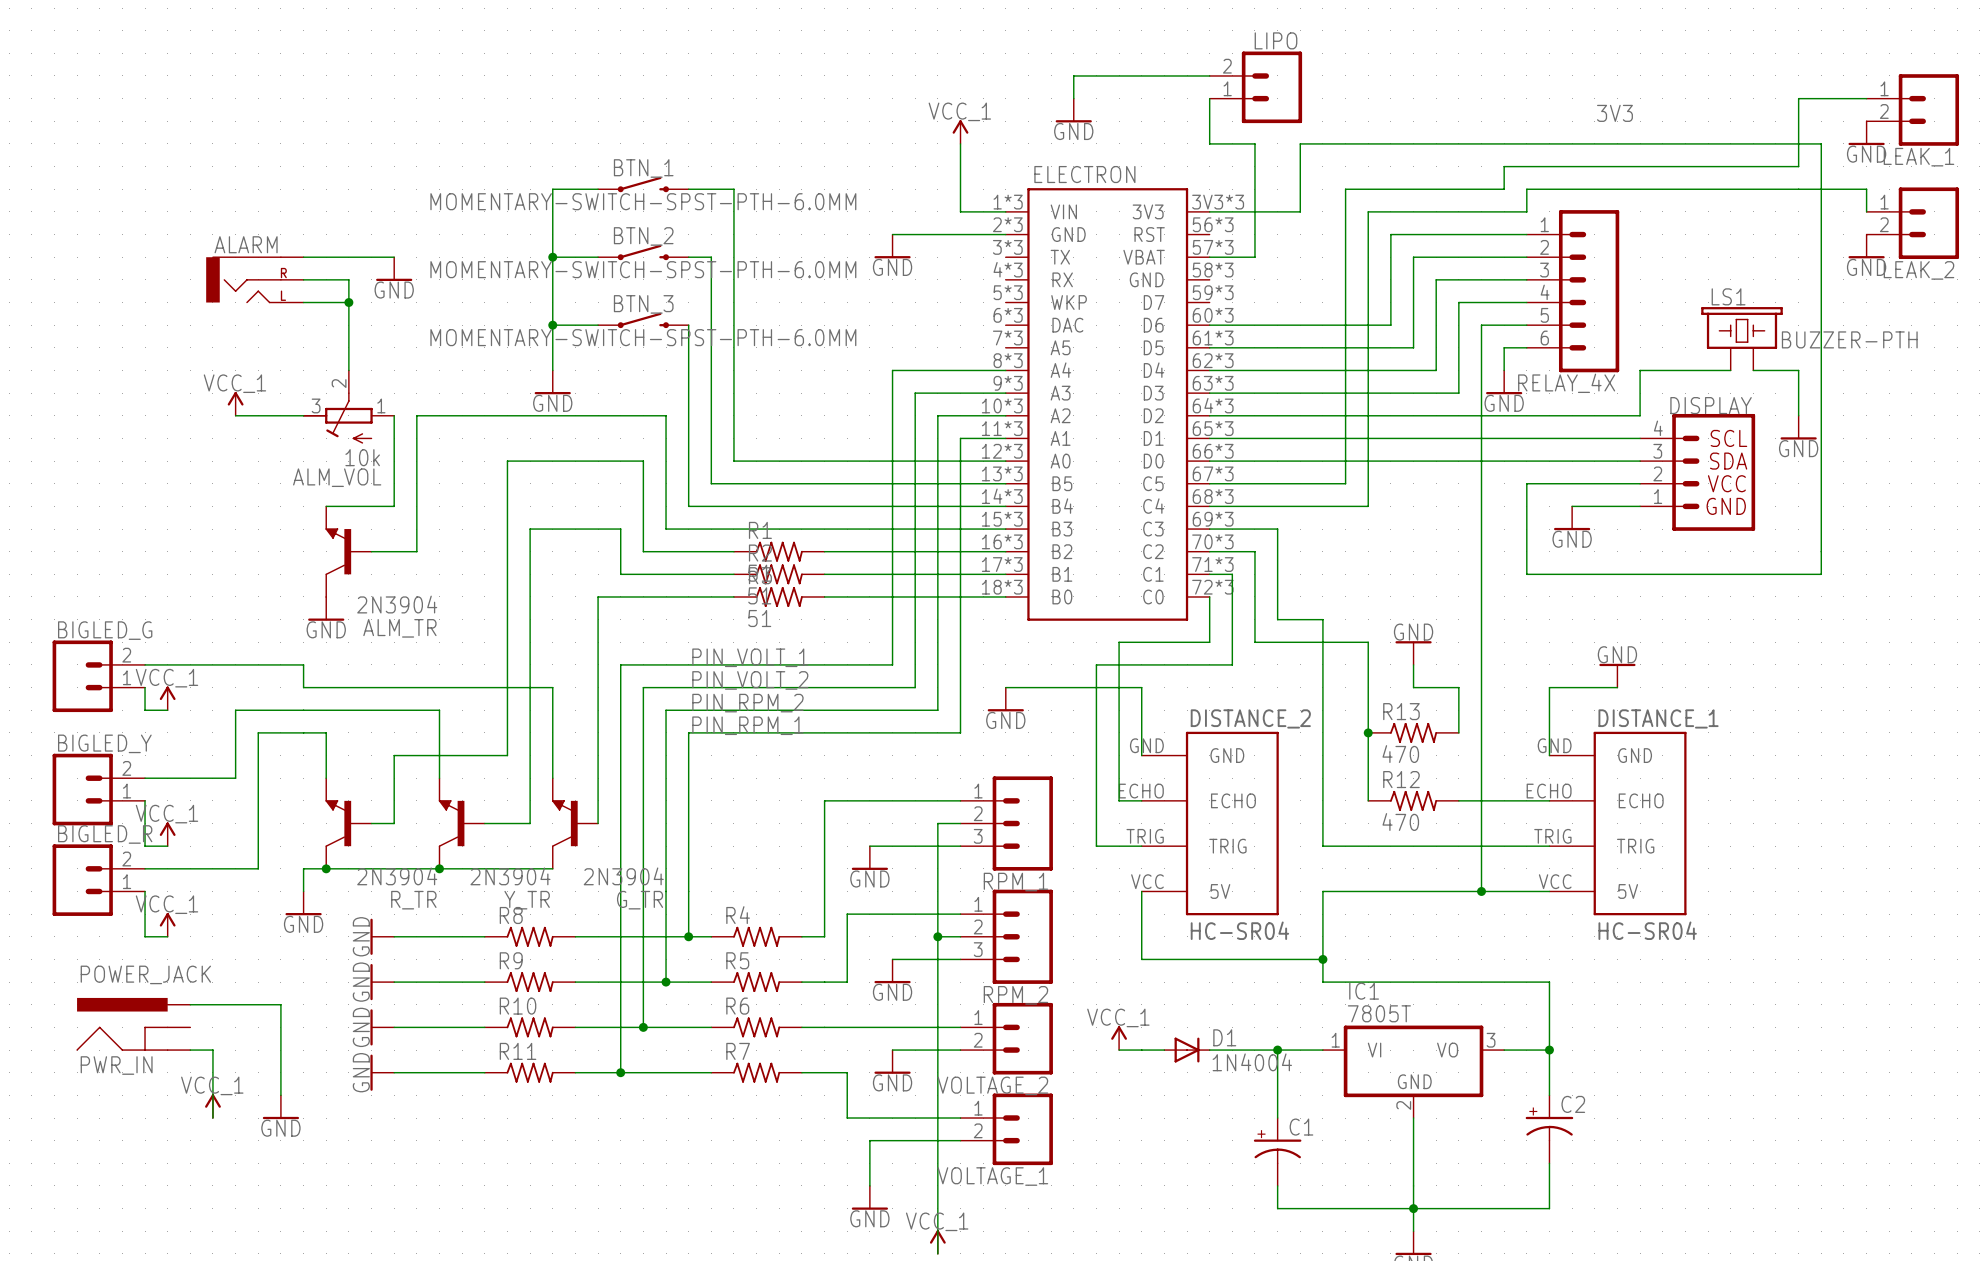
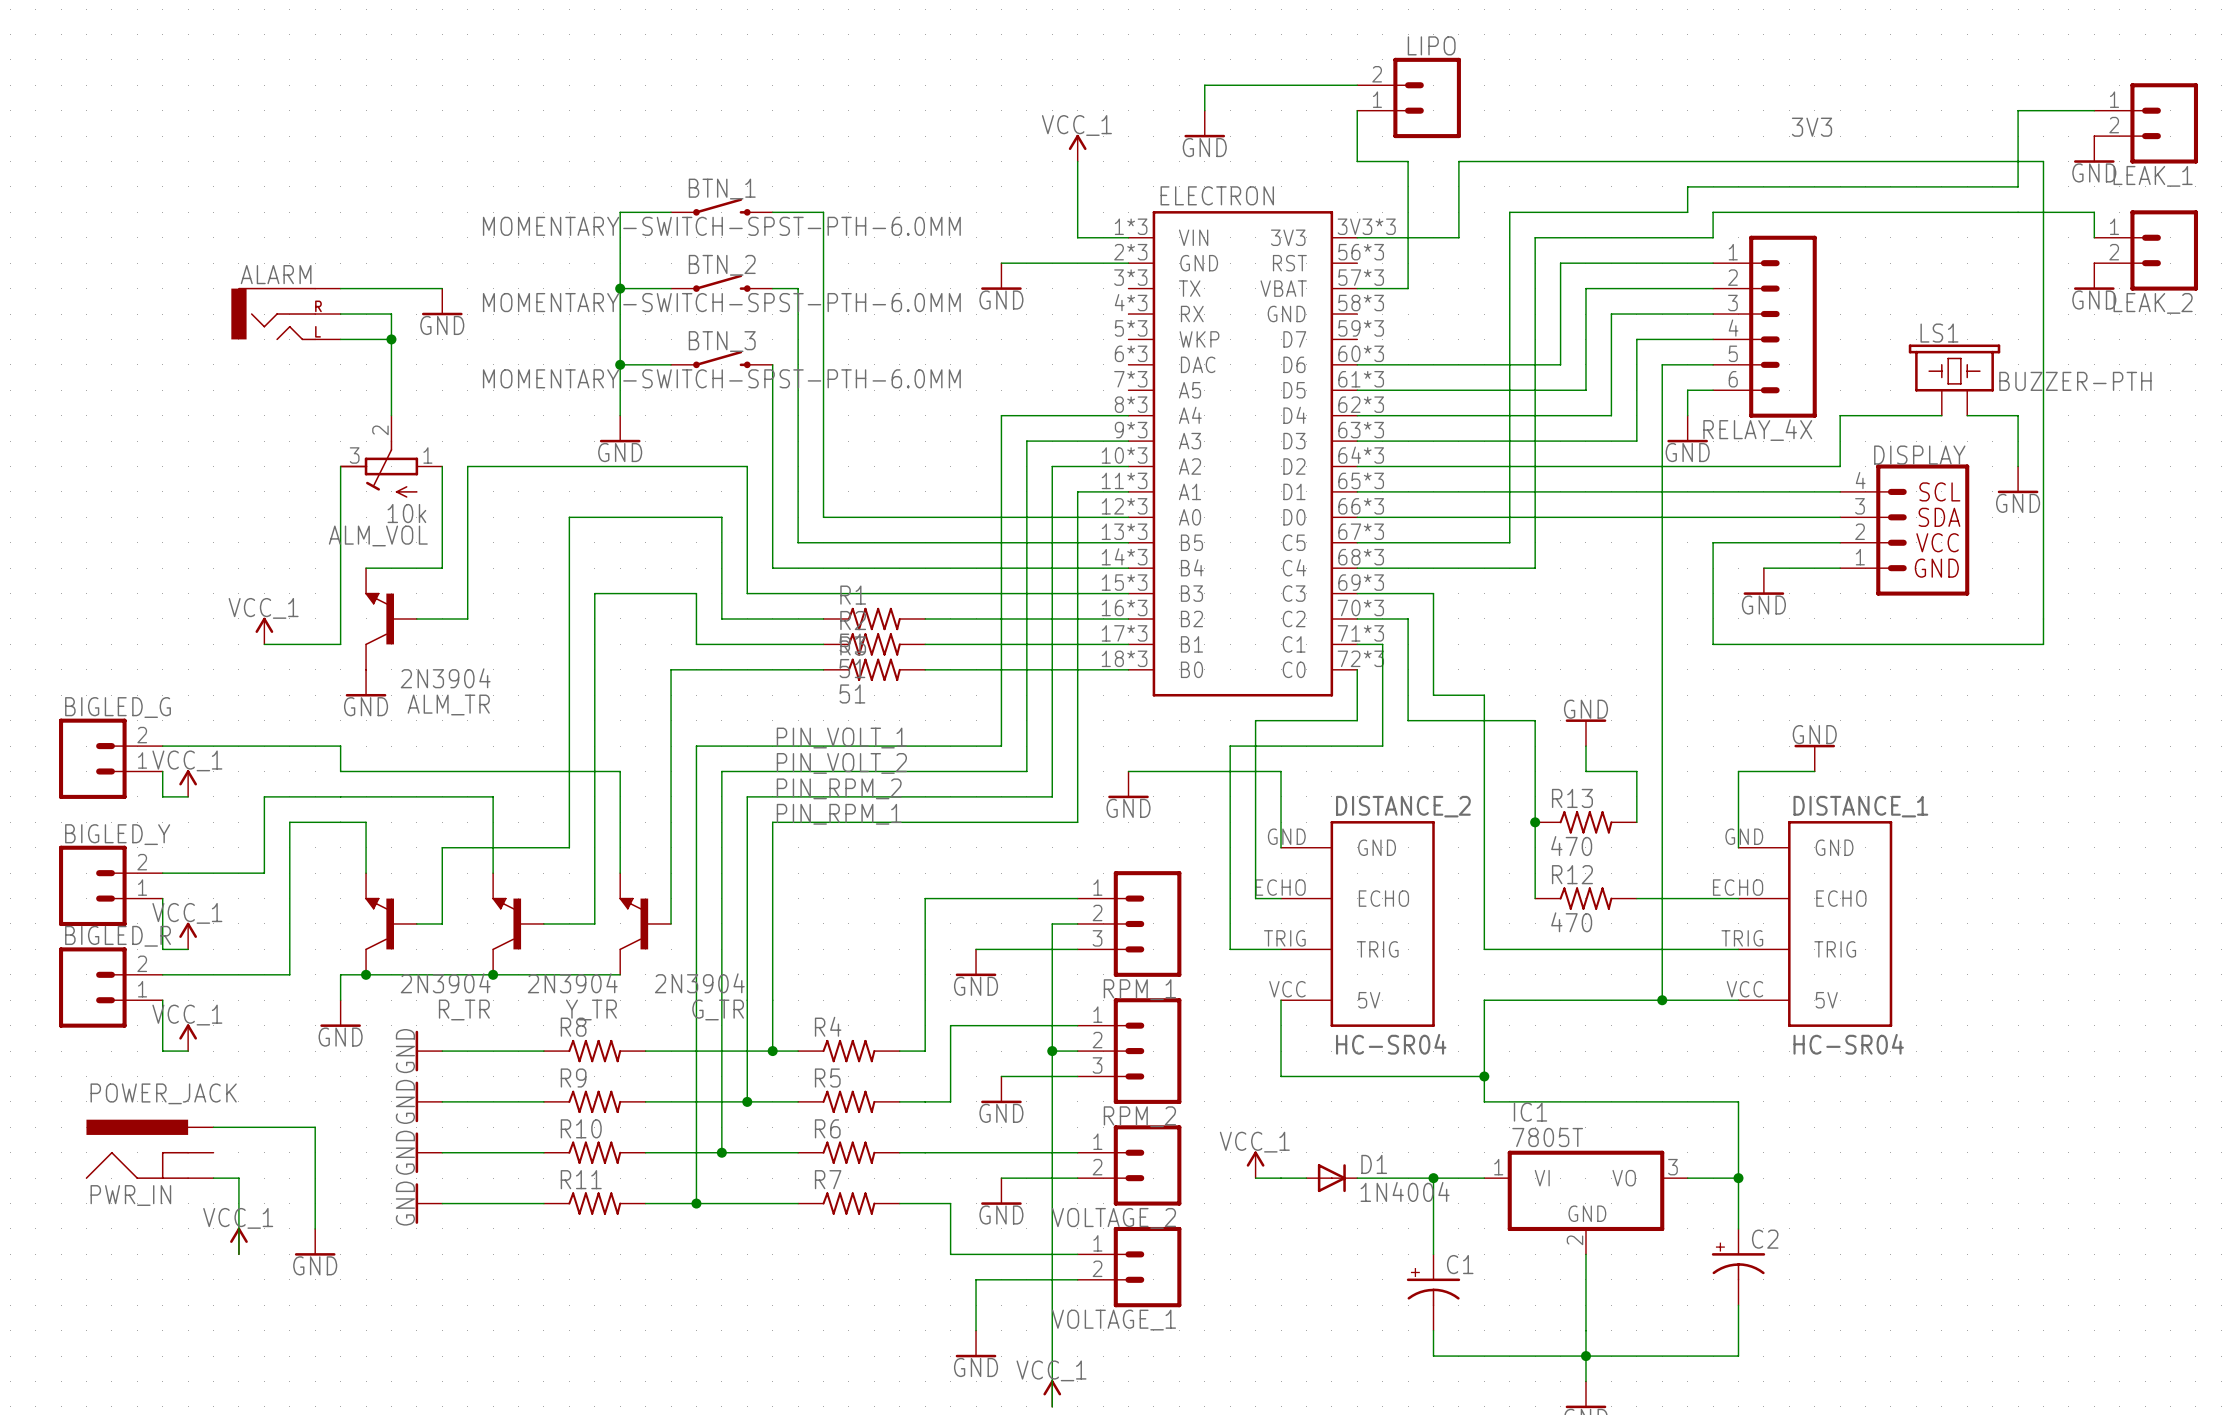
power symbol position: VCC_1 (235, 403) -> VCC_1 (264, 631)
wire: (235, 415) (303, 415) -> (264, 644) (340, 644) (340, 466)

